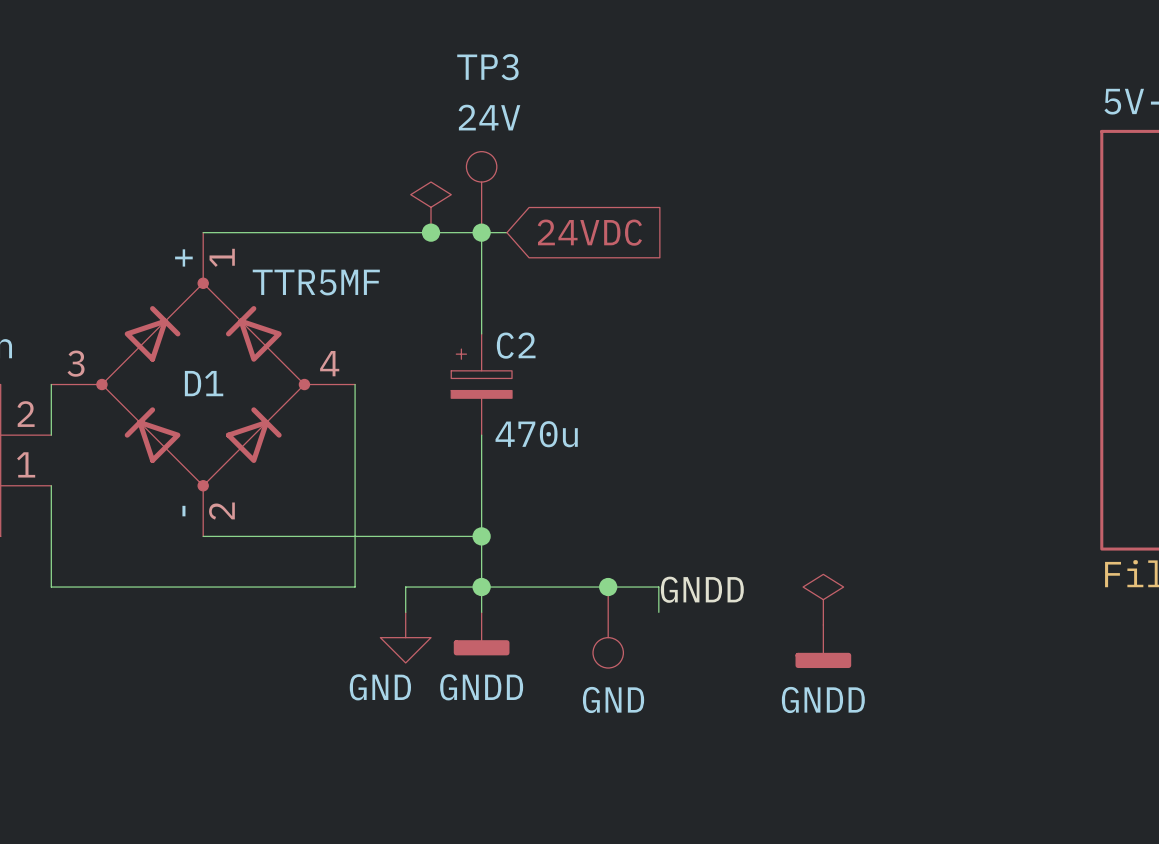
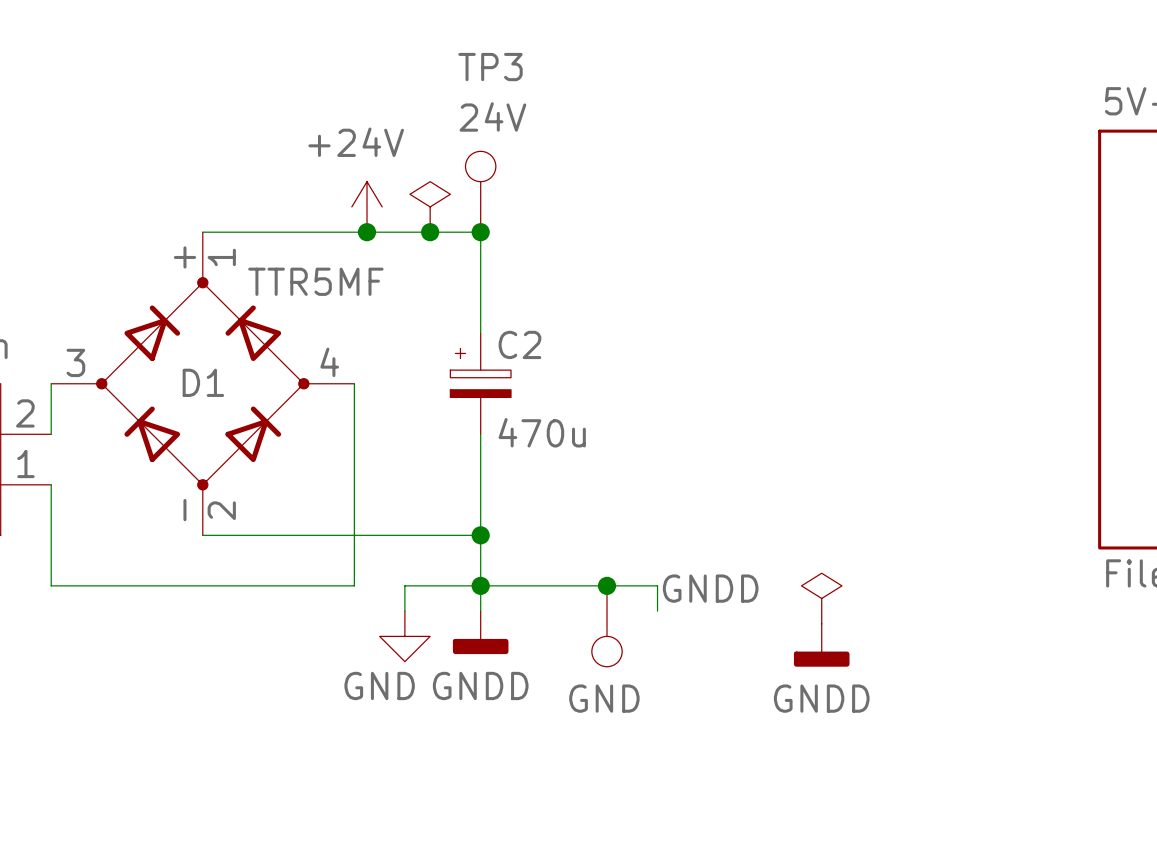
power symbol: none -> +24V (367, 206)
junction: none -> (367, 232)
wire: (481, 232) (506, 232) -> none
global label: 24VDC (589, 232) -> none

